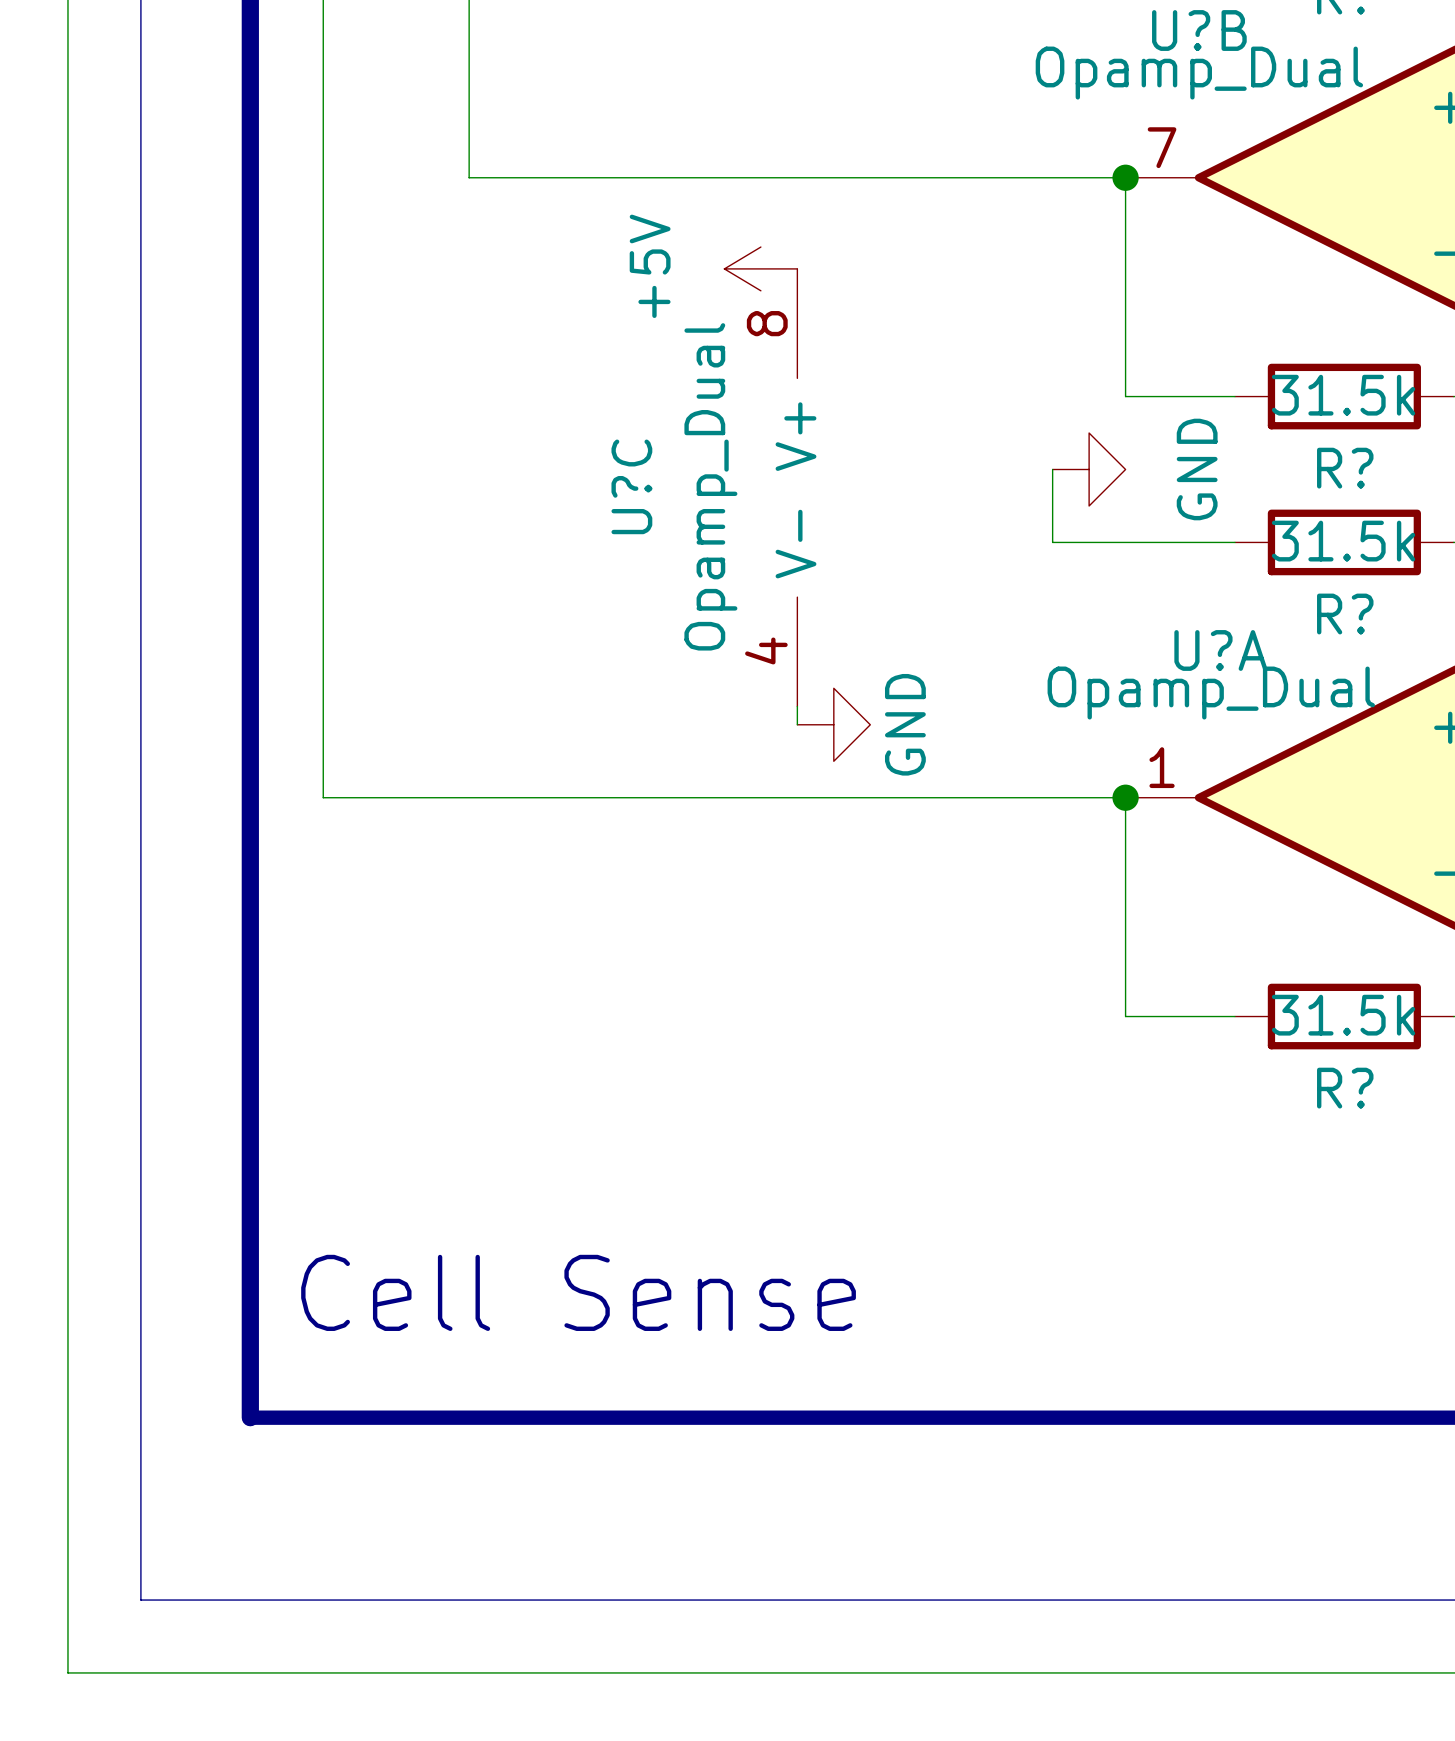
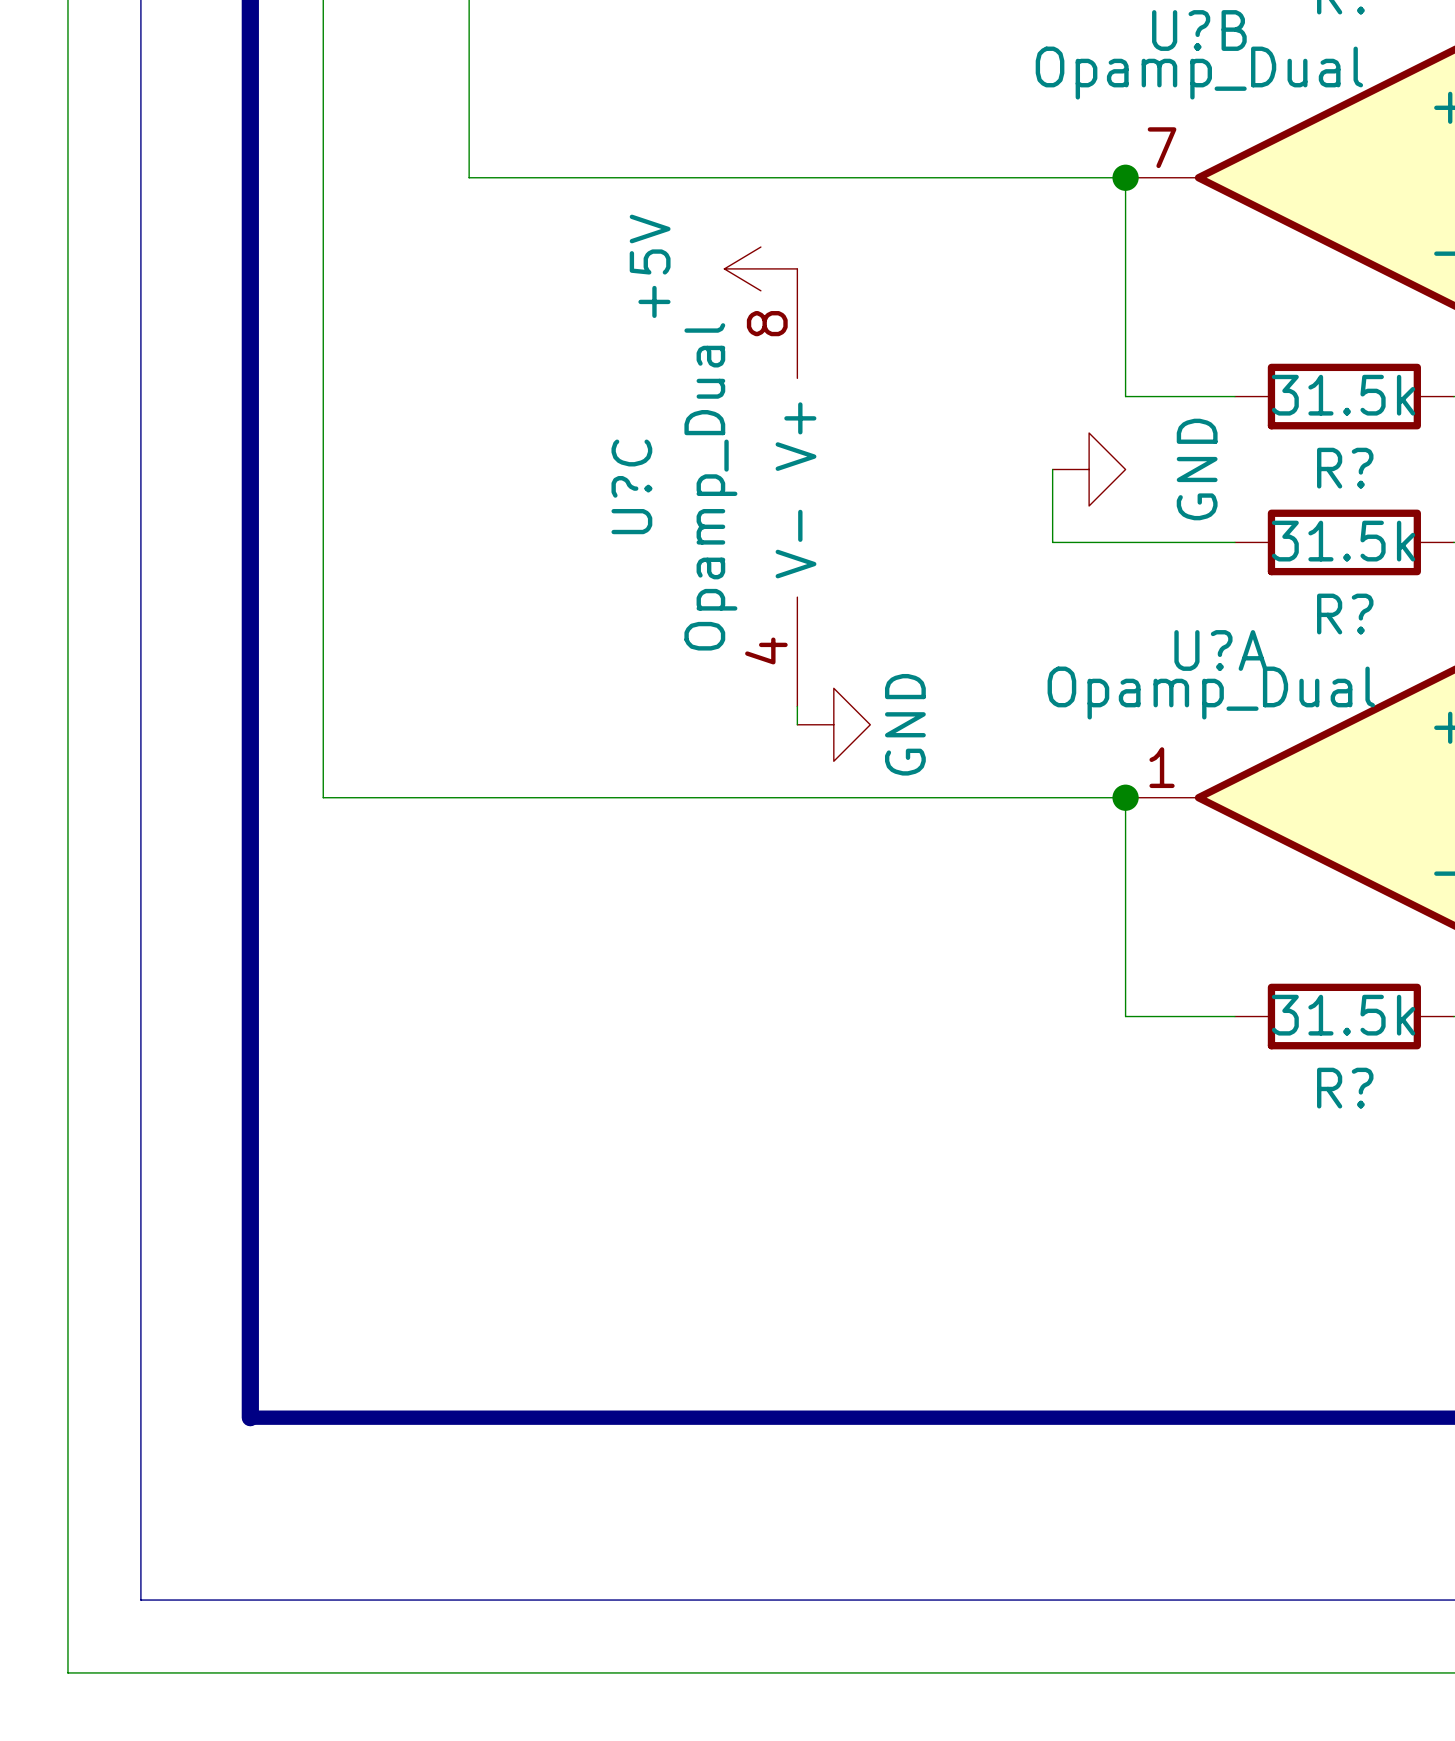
text: Cell Sense (578, 1292) -> none

